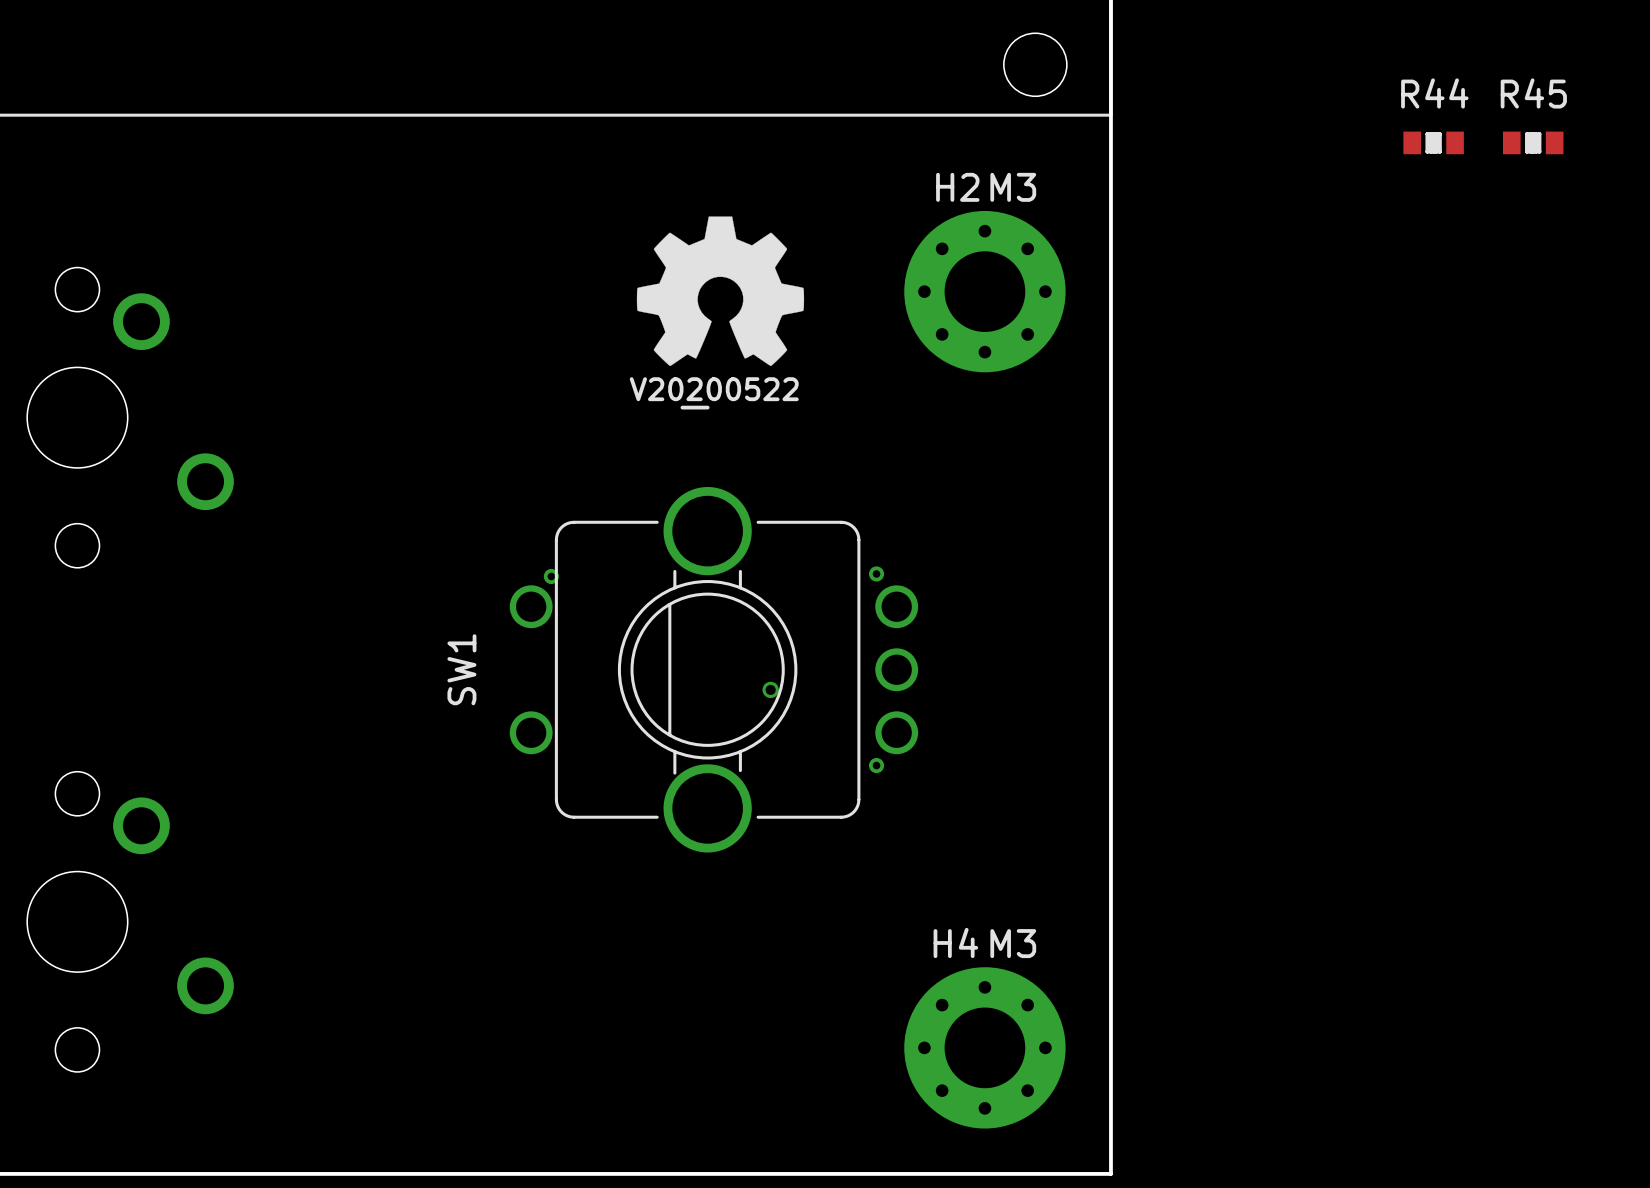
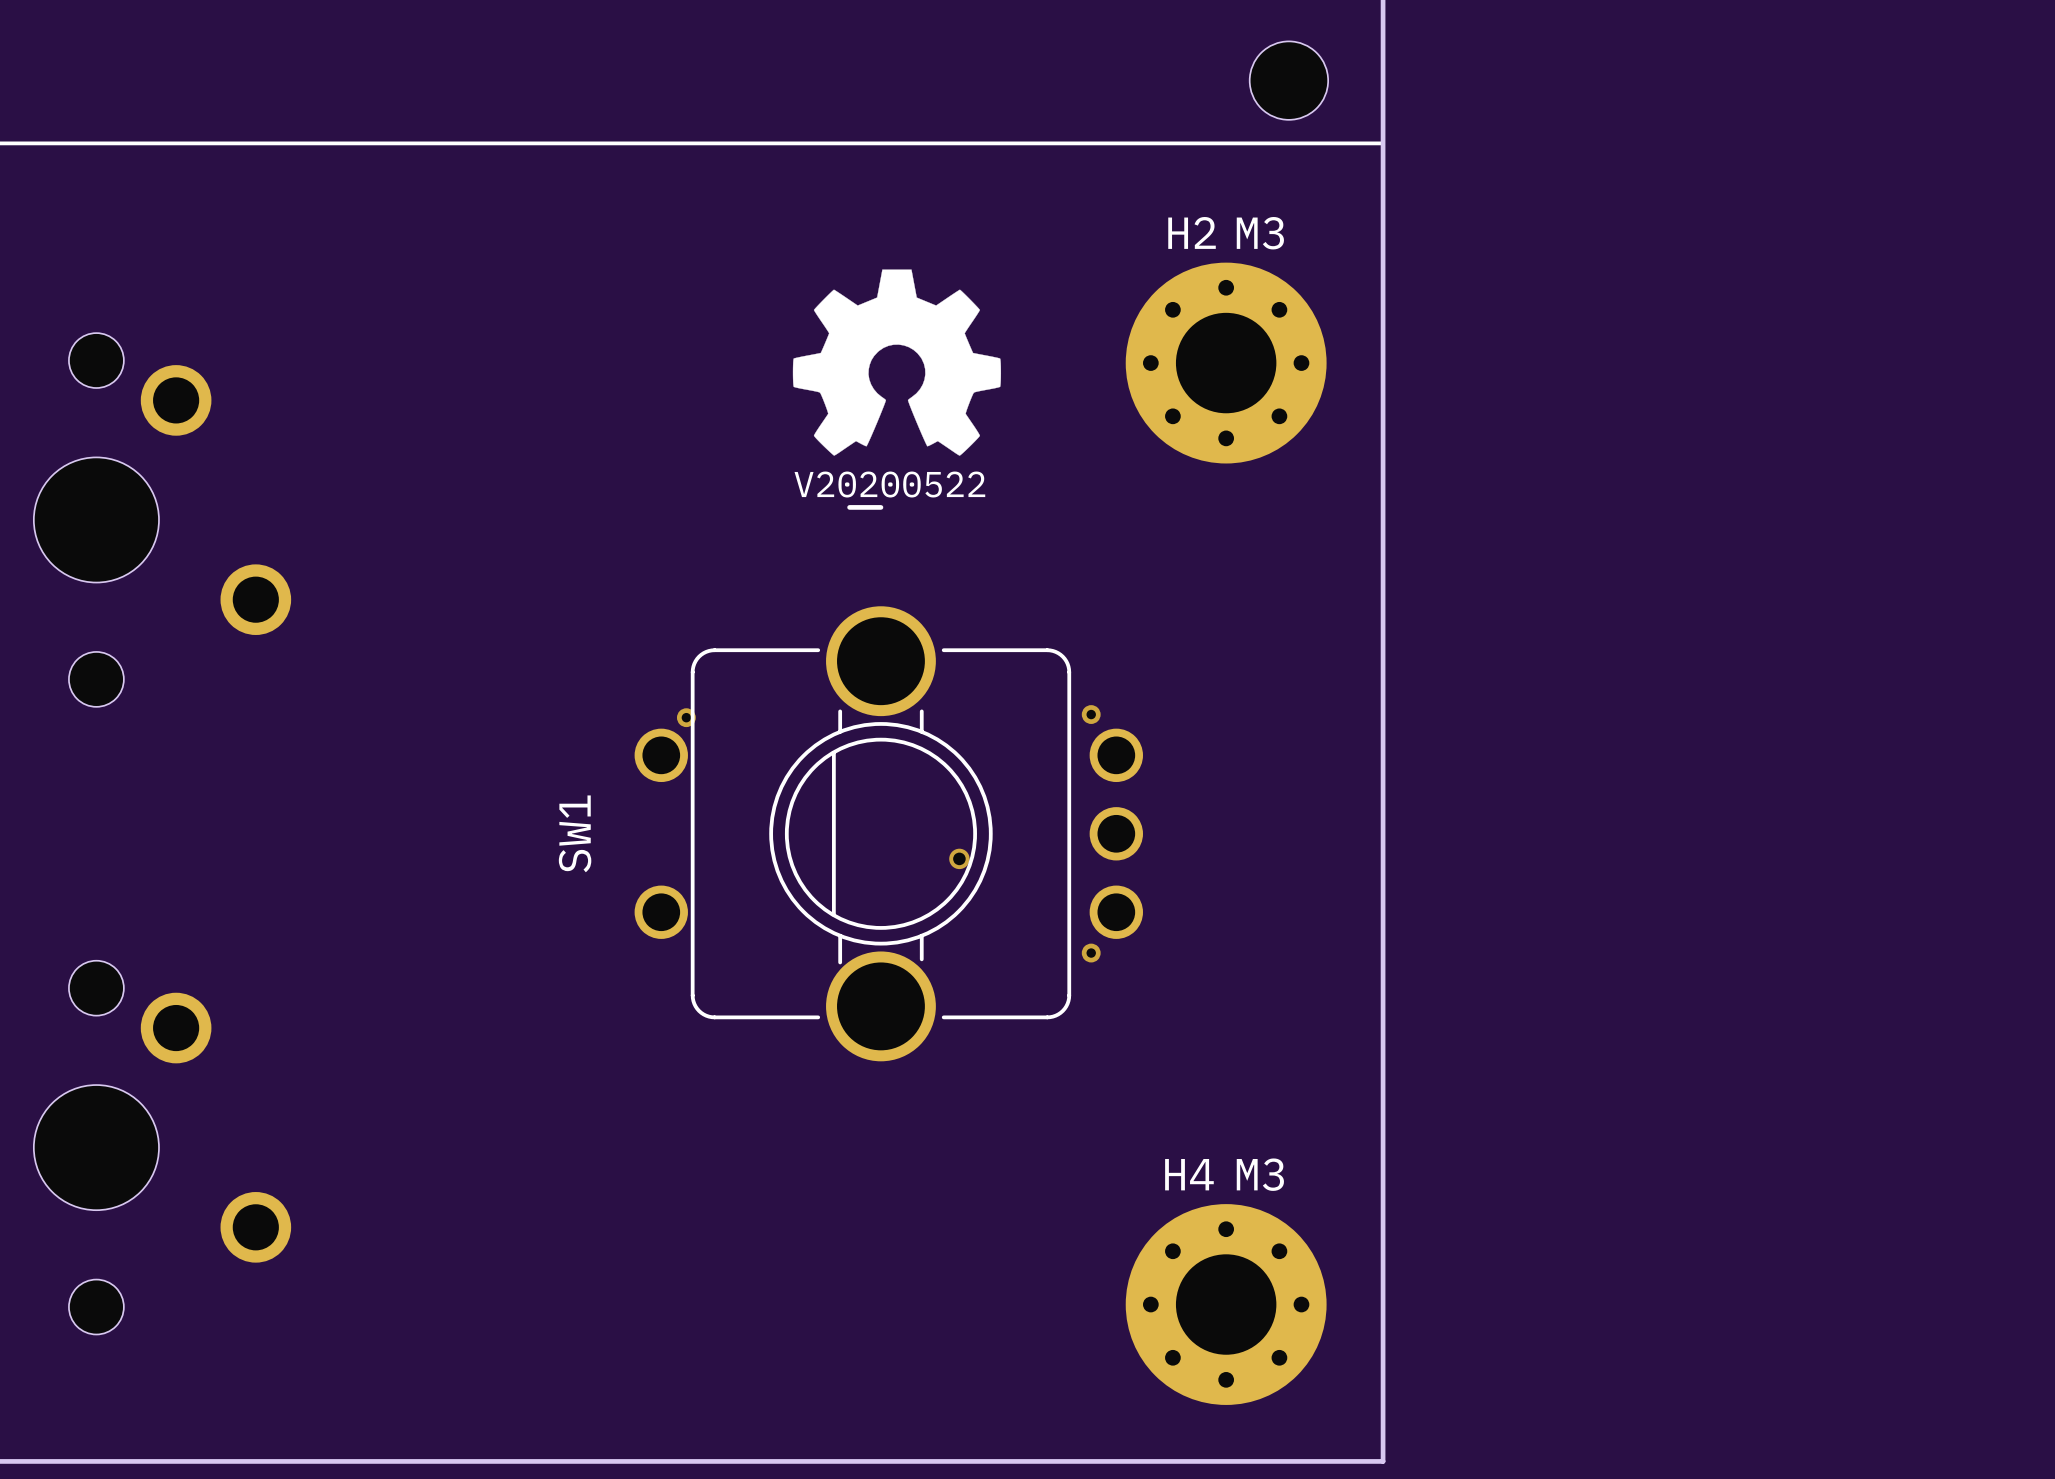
R44: (1433, 142) -> none
R45: (1533, 142) -> none

